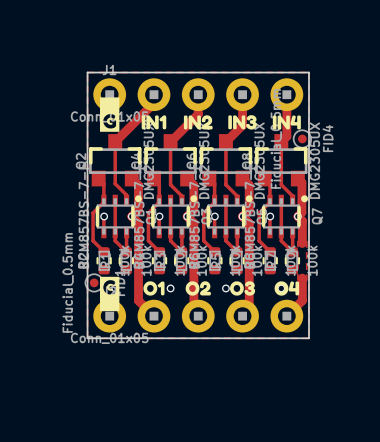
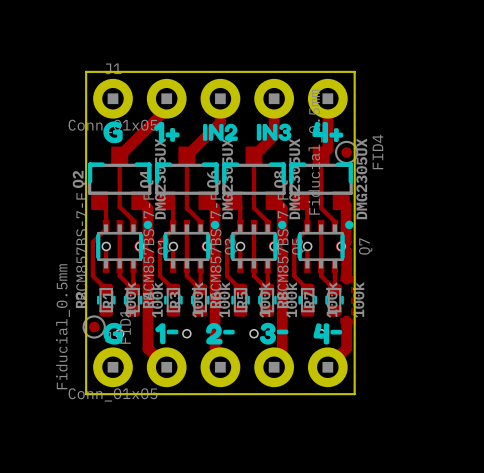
drawing shape: [99, 97, 120, 132] -> [103, 121, 123, 144]
drawing shape: [141, 115, 167, 130] -> [153, 121, 180, 143]
drawing shape: [272, 115, 301, 130] -> [312, 121, 344, 144]
drawing shape: [99, 276, 120, 312] -> [103, 322, 123, 345]
drawing shape: [143, 281, 165, 296] -> [155, 323, 179, 345]
drawing shape: [185, 281, 211, 296] -> [206, 322, 235, 345]
drawing shape: [230, 281, 256, 296] -> [259, 322, 289, 345]
drawing shape: [274, 281, 300, 296] -> [313, 323, 343, 345]

